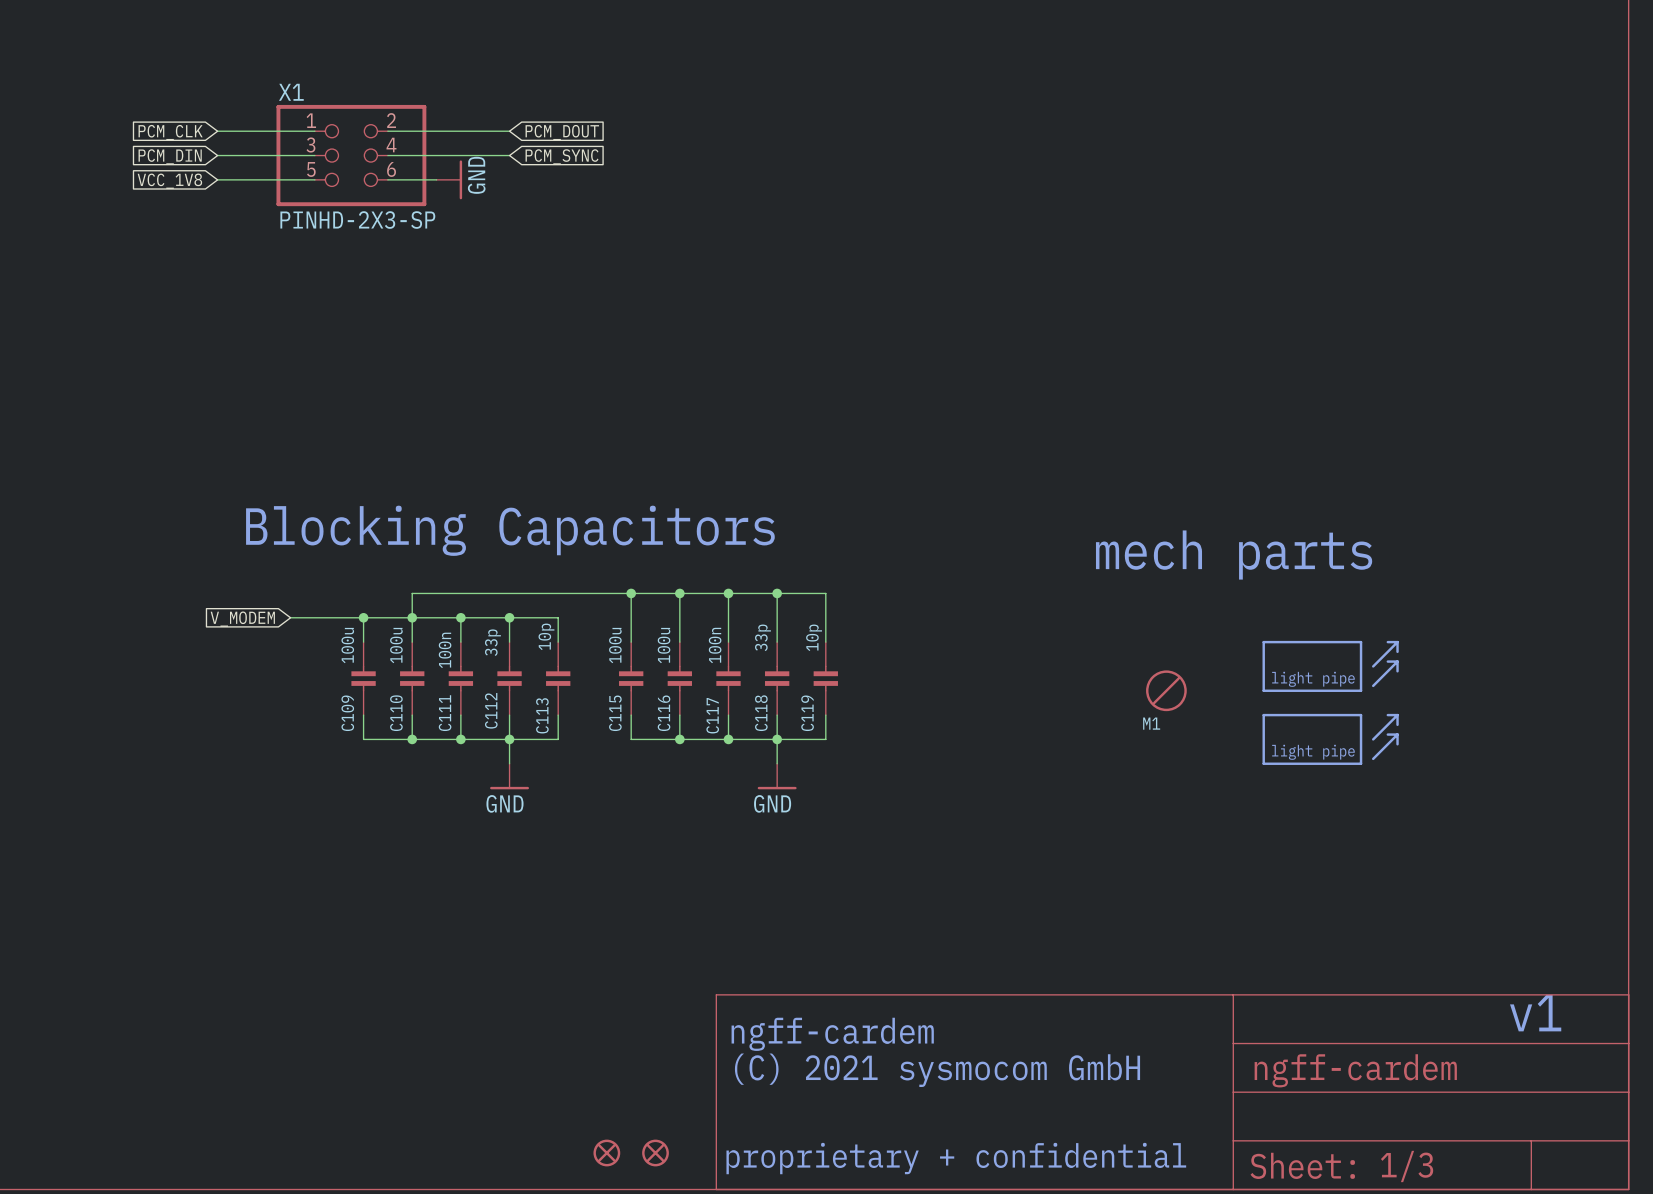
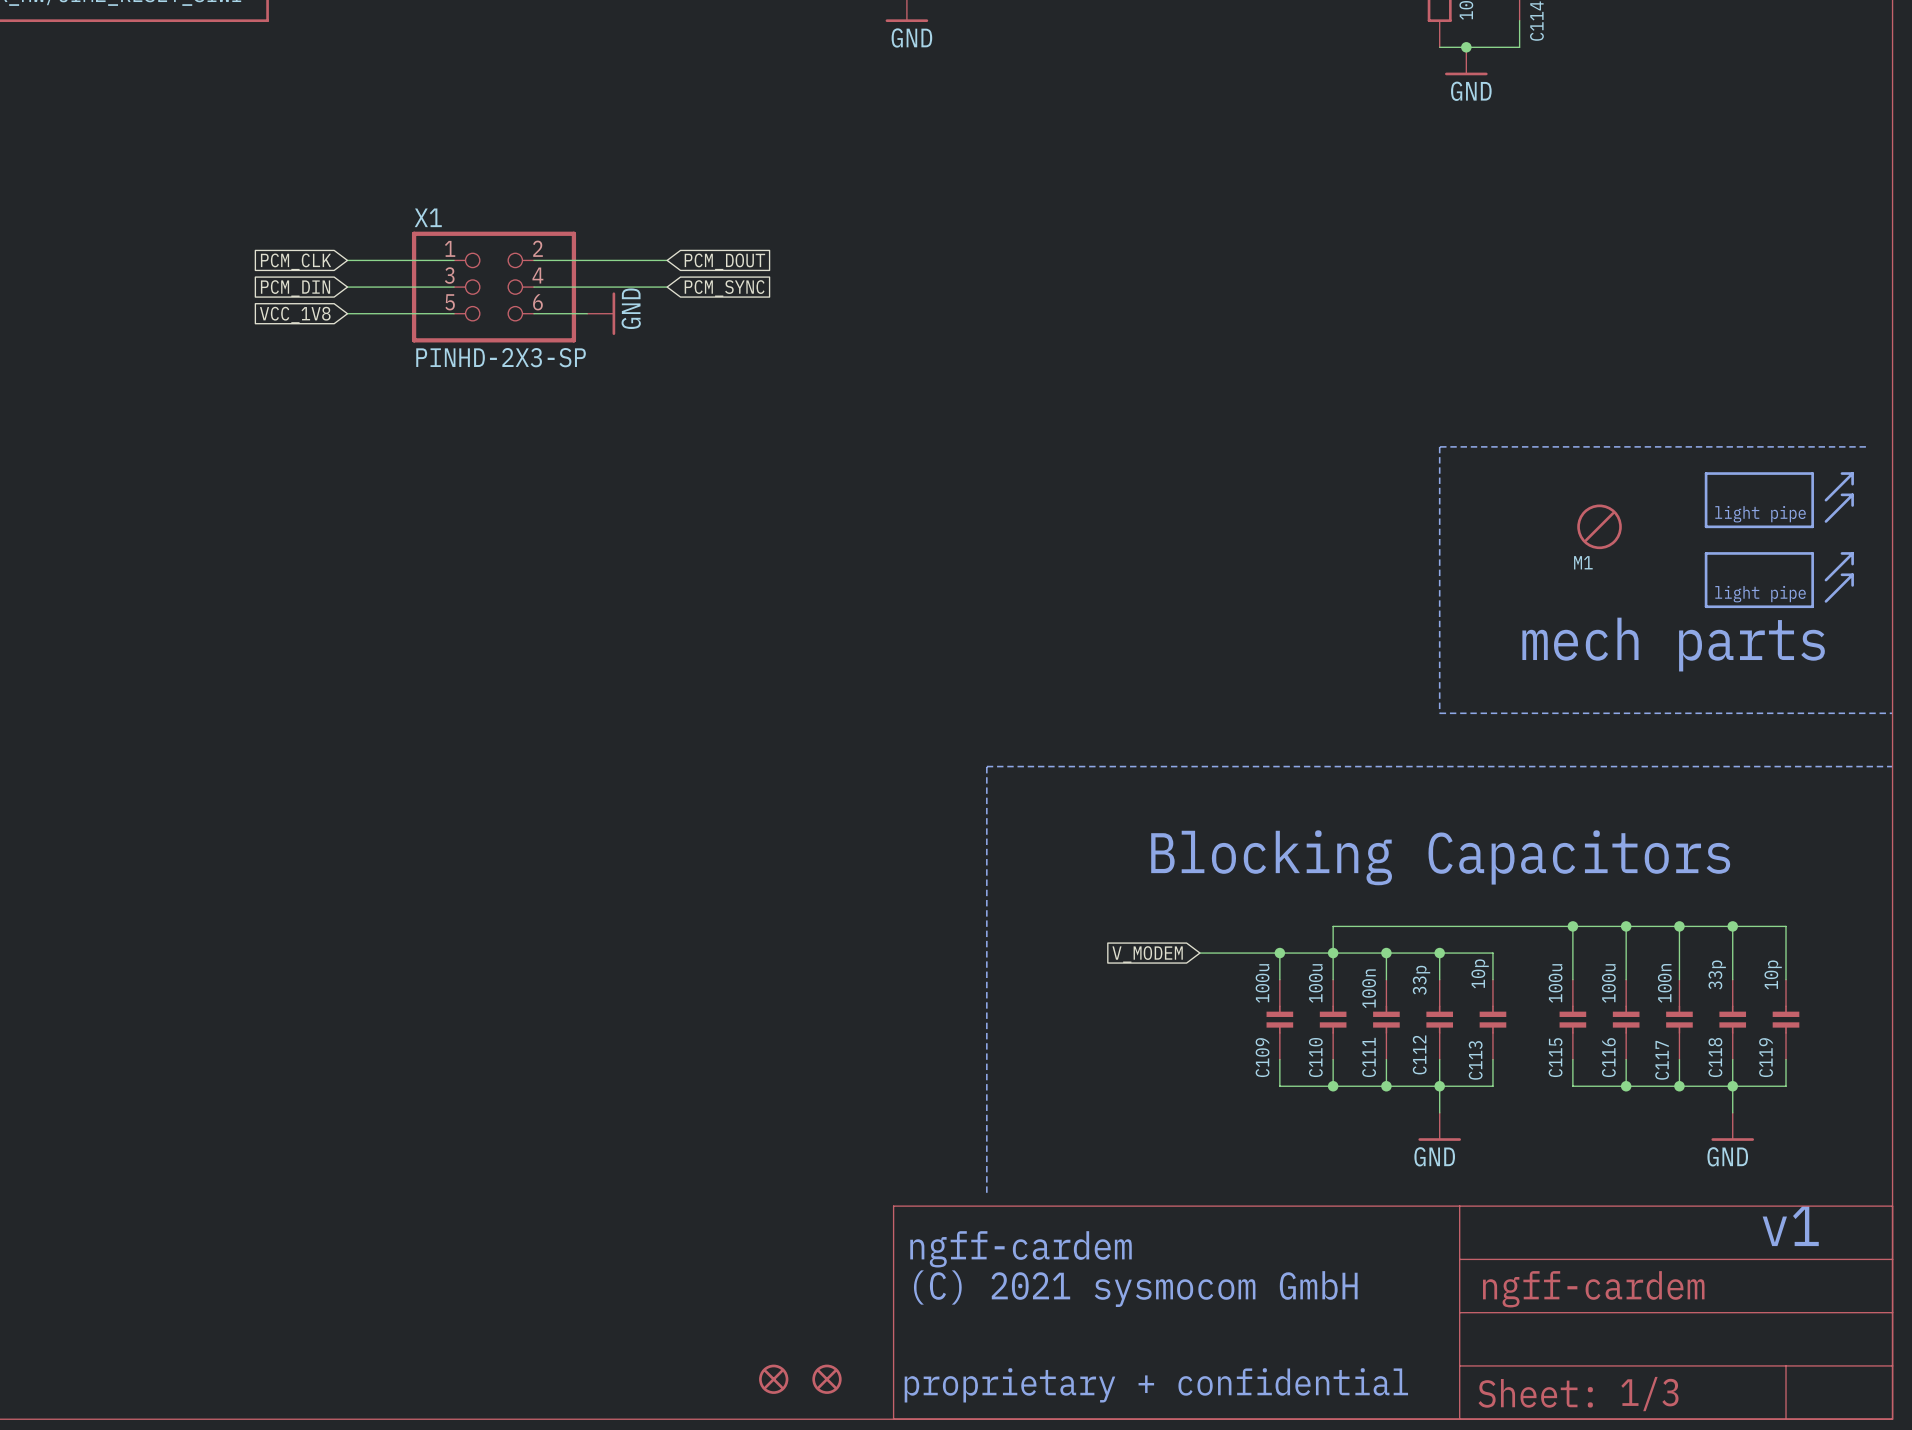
line: none -> (1865, 446) (1439, 446) (1439, 713) (1892, 713)
part: none -> (1779, 500)
part: none -> (1779, 580)
text: Blocking Capacitors (510, 530) -> none
text position: mech parts (1234, 555) -> mech parts (1673, 644)
wire: (631, 593) (631, 642) -> none
junction: (631, 593) -> none
wire: (679, 593) (679, 642) -> none
junction: (679, 593) -> none
wire: (728, 593) (728, 642) -> none
junction: (728, 593) -> none
wire: (777, 593) (777, 642) -> none
junction: (777, 593) -> none
line: none -> (1892, 766) (986, 766) (986, 1192)
wire: (290, 617) (558, 617) (558, 642) -> none
wire: (363, 617) (363, 642) -> none
junction: (363, 617) -> none
junction: (412, 617) -> none
wire: (460, 617) (460, 642) -> none
junction: (460, 617) -> none
wire: (509, 617) (509, 642) -> none
junction: (509, 617) -> none
global label: V_MODEM (242, 619) -> none
wire: (412, 642) (412, 593) (825, 593) (825, 642) -> none
part: (1330, 666) -> none
text: none -> Blocking Capacitors (1440, 857)
C109 position: (363, 678) -> (1279, 1019)
C110 position: (412, 678) -> (1333, 1019)
C111 position: (460, 678) -> (1386, 1019)
C112 position: (509, 678) -> (1439, 1019)
C113 position: (558, 678) -> (1492, 1019)
C115 position: (631, 678) -> (1572, 1019)
C116 position: (679, 678) -> (1626, 1019)
C117 position: (728, 678) -> (1679, 1019)
C118 position: (777, 678) -> (1732, 1019)
C119 position: (825, 678) -> (1786, 1019)
M1 position: (1166, 690) -> (1599, 526)
wire: (363, 715) (363, 739) (558, 739) (558, 715) -> none
wire: (412, 715) (412, 739) -> none
wire: (460, 715) (460, 739) -> none
wire: (509, 715) (509, 763) -> none
wire: (631, 715) (631, 739) (825, 739) (825, 715) -> none
wire: (679, 715) (679, 739) -> none
wire: (728, 715) (728, 739) -> none
wire: (777, 715) (777, 763) -> none
junction: (412, 739) -> none
junction: (460, 739) -> none
junction: (509, 739) -> none
junction: (679, 739) -> none
junction: (728, 739) -> none
junction: (777, 739) -> none
part: (1330, 739) -> none
wire: none -> (1572, 926) (1572, 979)
junction: none -> (1572, 926)
wire: none -> (1626, 926) (1626, 979)
junction: none -> (1626, 926)
wire: none -> (1679, 926) (1679, 979)
junction: none -> (1679, 926)
wire: none -> (1732, 926) (1732, 979)
junction: none -> (1732, 926)
wire: none -> (1199, 953) (1492, 953) (1492, 979)
wire: none -> (1279, 953) (1279, 979)
junction: none -> (1279, 953)
junction: none -> (1333, 953)
wire: none -> (1386, 953) (1386, 979)
junction: none -> (1386, 953)
wire: none -> (1439, 953) (1439, 979)
junction: none -> (1439, 953)
global label: none -> V_MODEM (1147, 954)
power symbol: GND (509, 776) -> none
power symbol: GND (777, 776) -> none
wire: none -> (1333, 979) (1333, 926) (1786, 926) (1786, 979)
wire: none -> (1279, 1059) (1279, 1086) (1492, 1086) (1492, 1059)
wire: none -> (1333, 1059) (1333, 1086)
wire: none -> (1386, 1059) (1386, 1086)
wire: none -> (1439, 1059) (1439, 1112)
wire: none -> (1572, 1059) (1572, 1086) (1786, 1086) (1786, 1059)
wire: none -> (1626, 1059) (1626, 1086)
wire: none -> (1679, 1059) (1679, 1086)
wire: none -> (1732, 1059) (1732, 1112)
junction: none -> (1333, 1086)
junction: none -> (1386, 1086)
junction: none -> (1439, 1086)
junction: none -> (1626, 1086)
junction: none -> (1679, 1086)
junction: none -> (1732, 1086)
power symbol: none -> GND (1439, 1126)
power symbol: none -> GND (1732, 1126)

